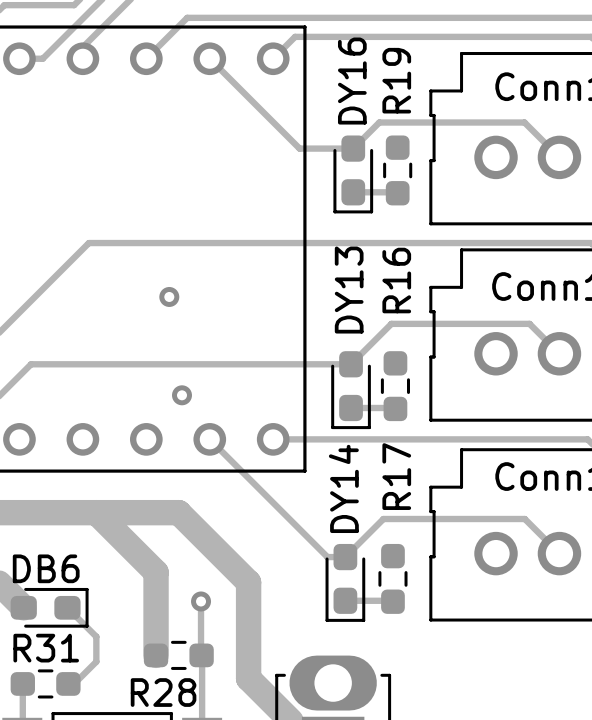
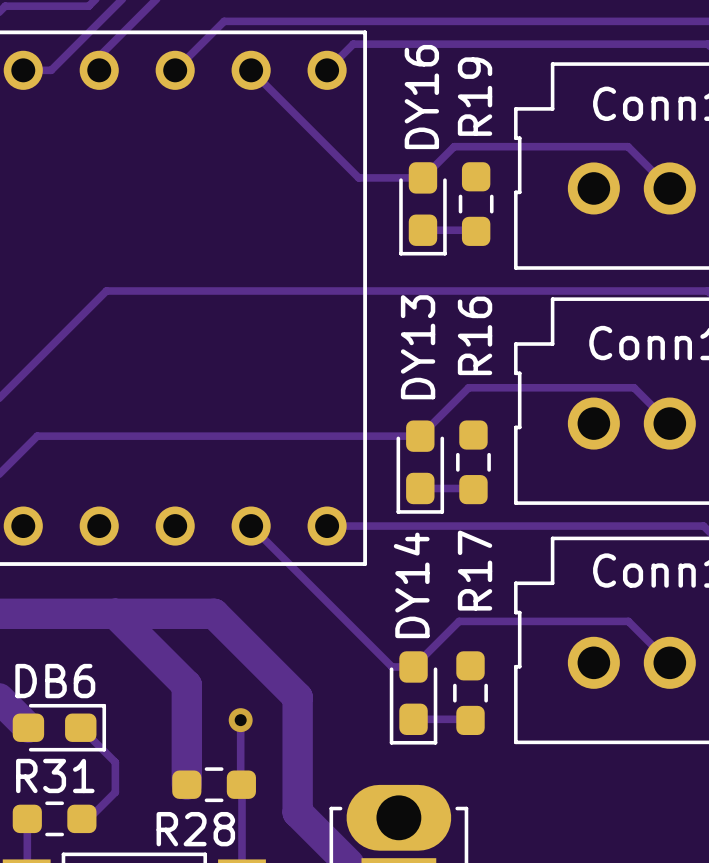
via: (169, 296) -> none
via: (181, 395) -> none

